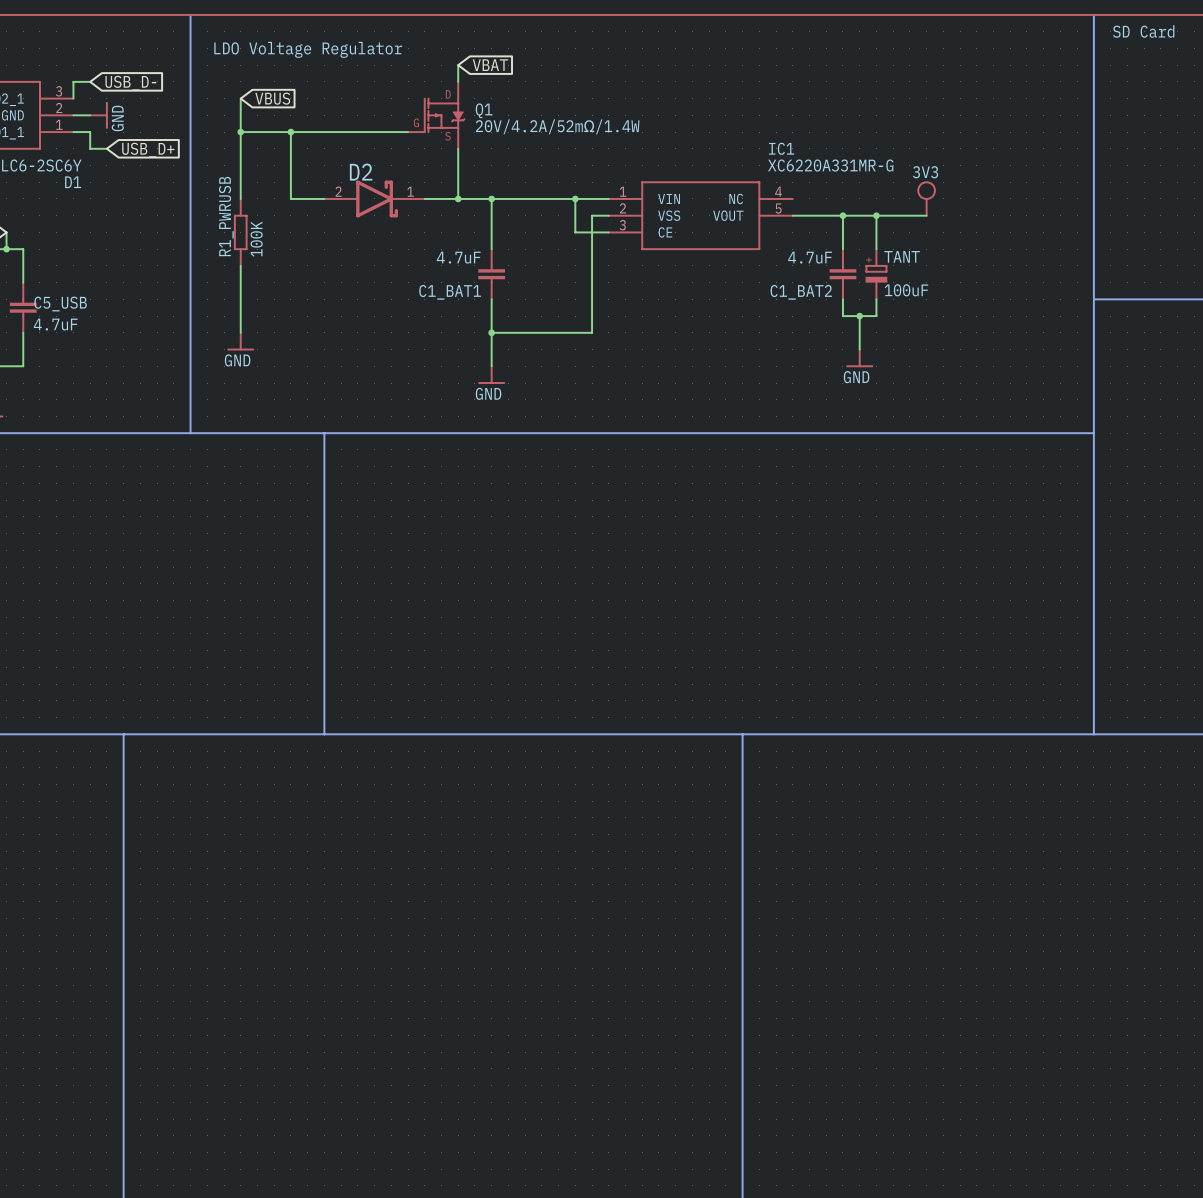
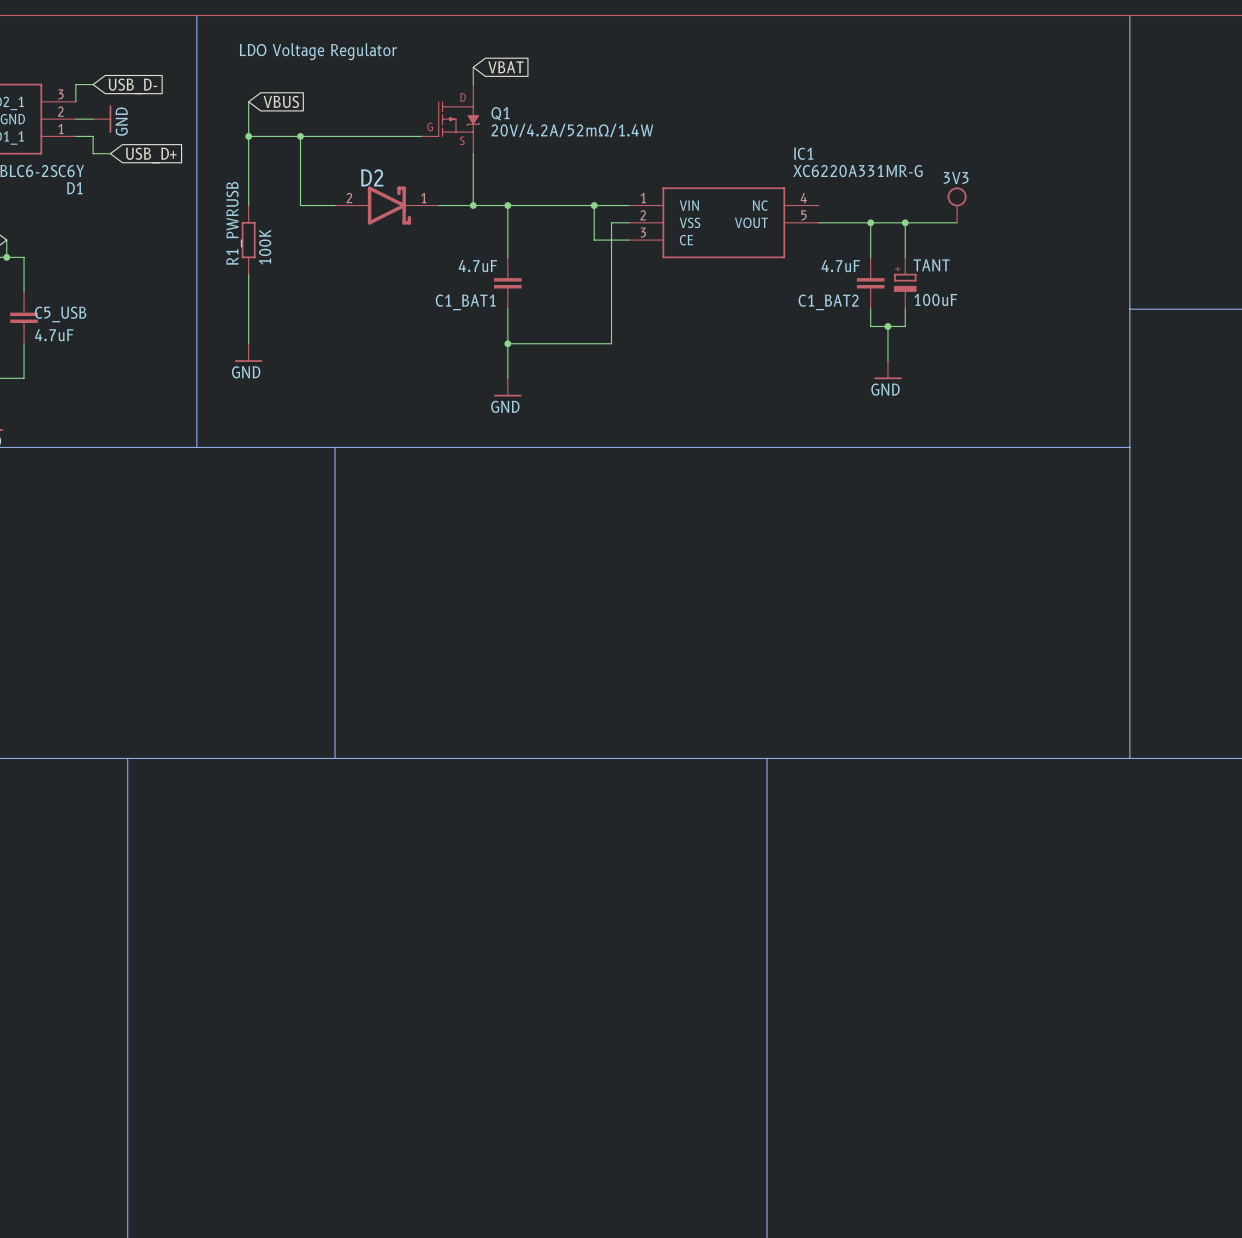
text: SD Card (1143, 31) -> none

